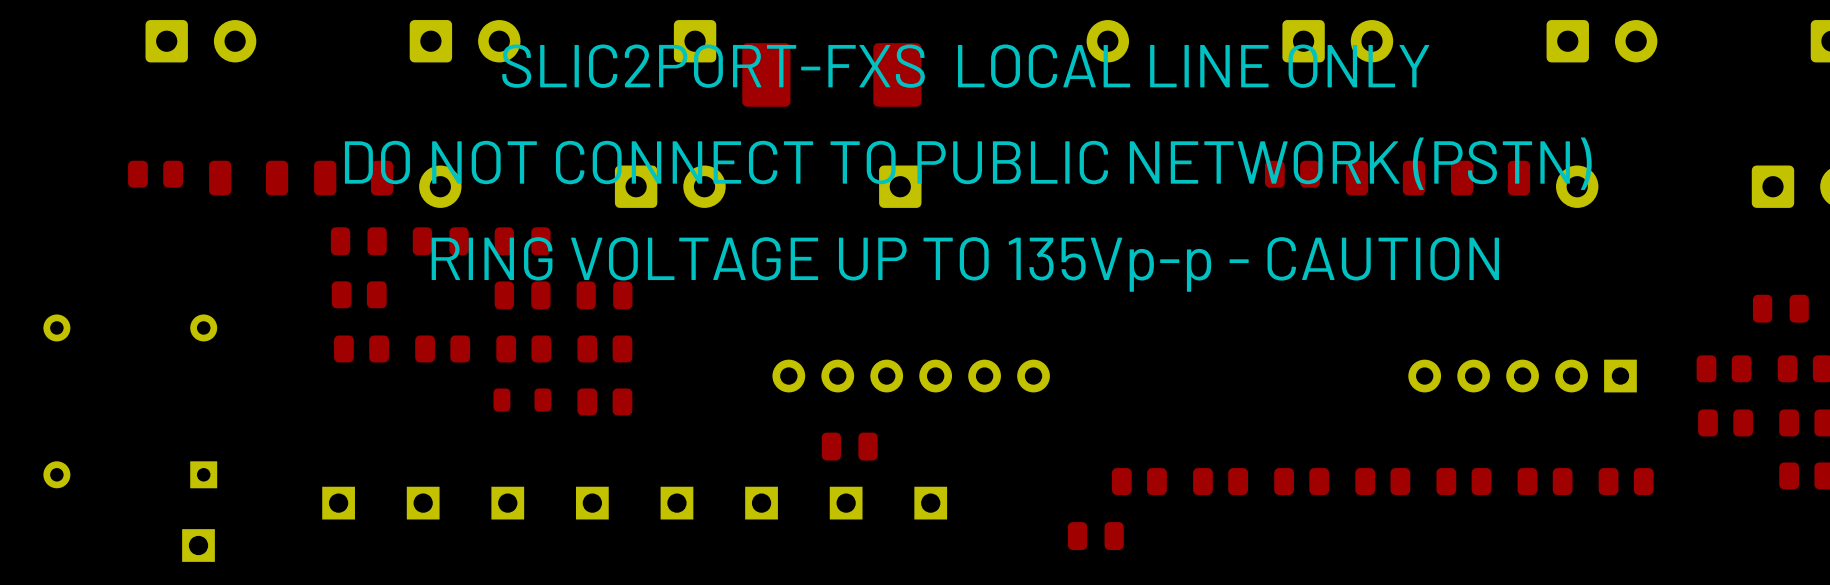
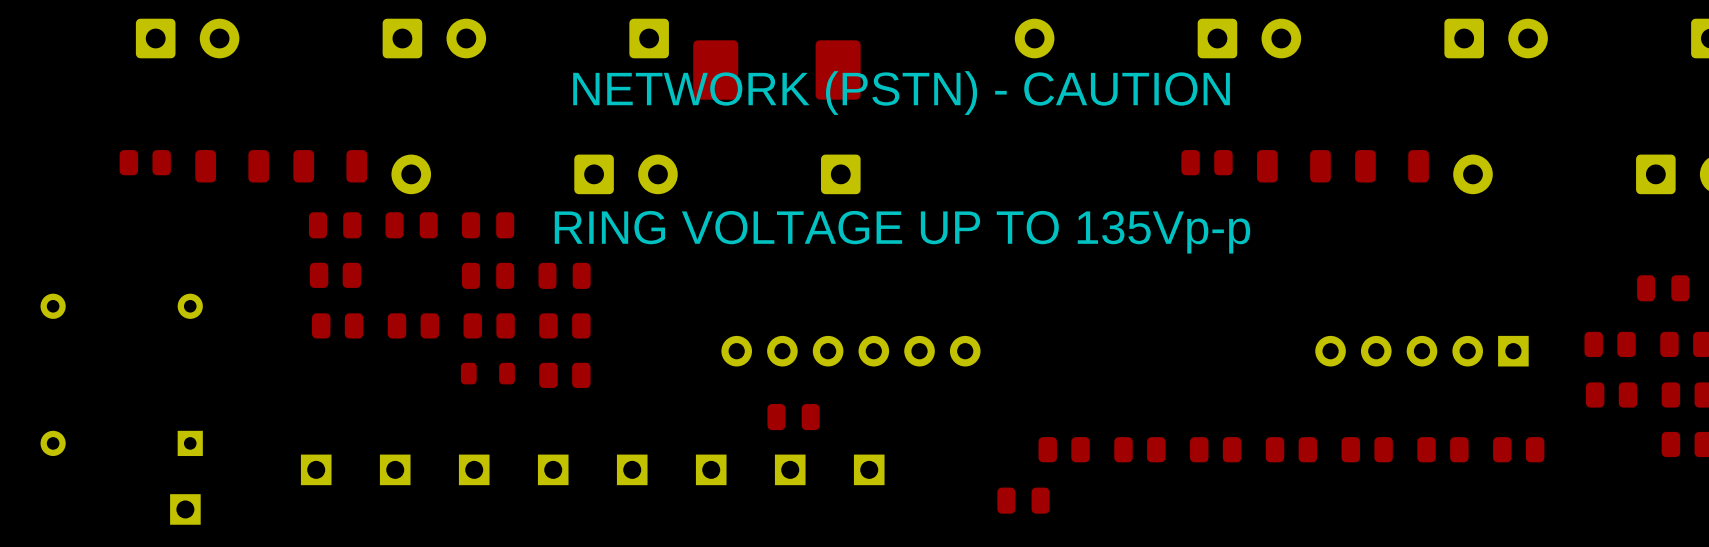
text: SLIC2PORT-FXS LOCAL LINE ONLY (965, 66) -> none
text: none -> NETWORK (PSTN) - CAUTION (901, 93)
text: DO NOT CONNECT TO PUBLIC NETWORK (PSTN) (968, 163) -> none
text: RING VOLTAGE UP TO 135Vp-p - CAUTION (965, 264) -> RING VOLTAGE UP TO 135Vp-p (902, 232)

